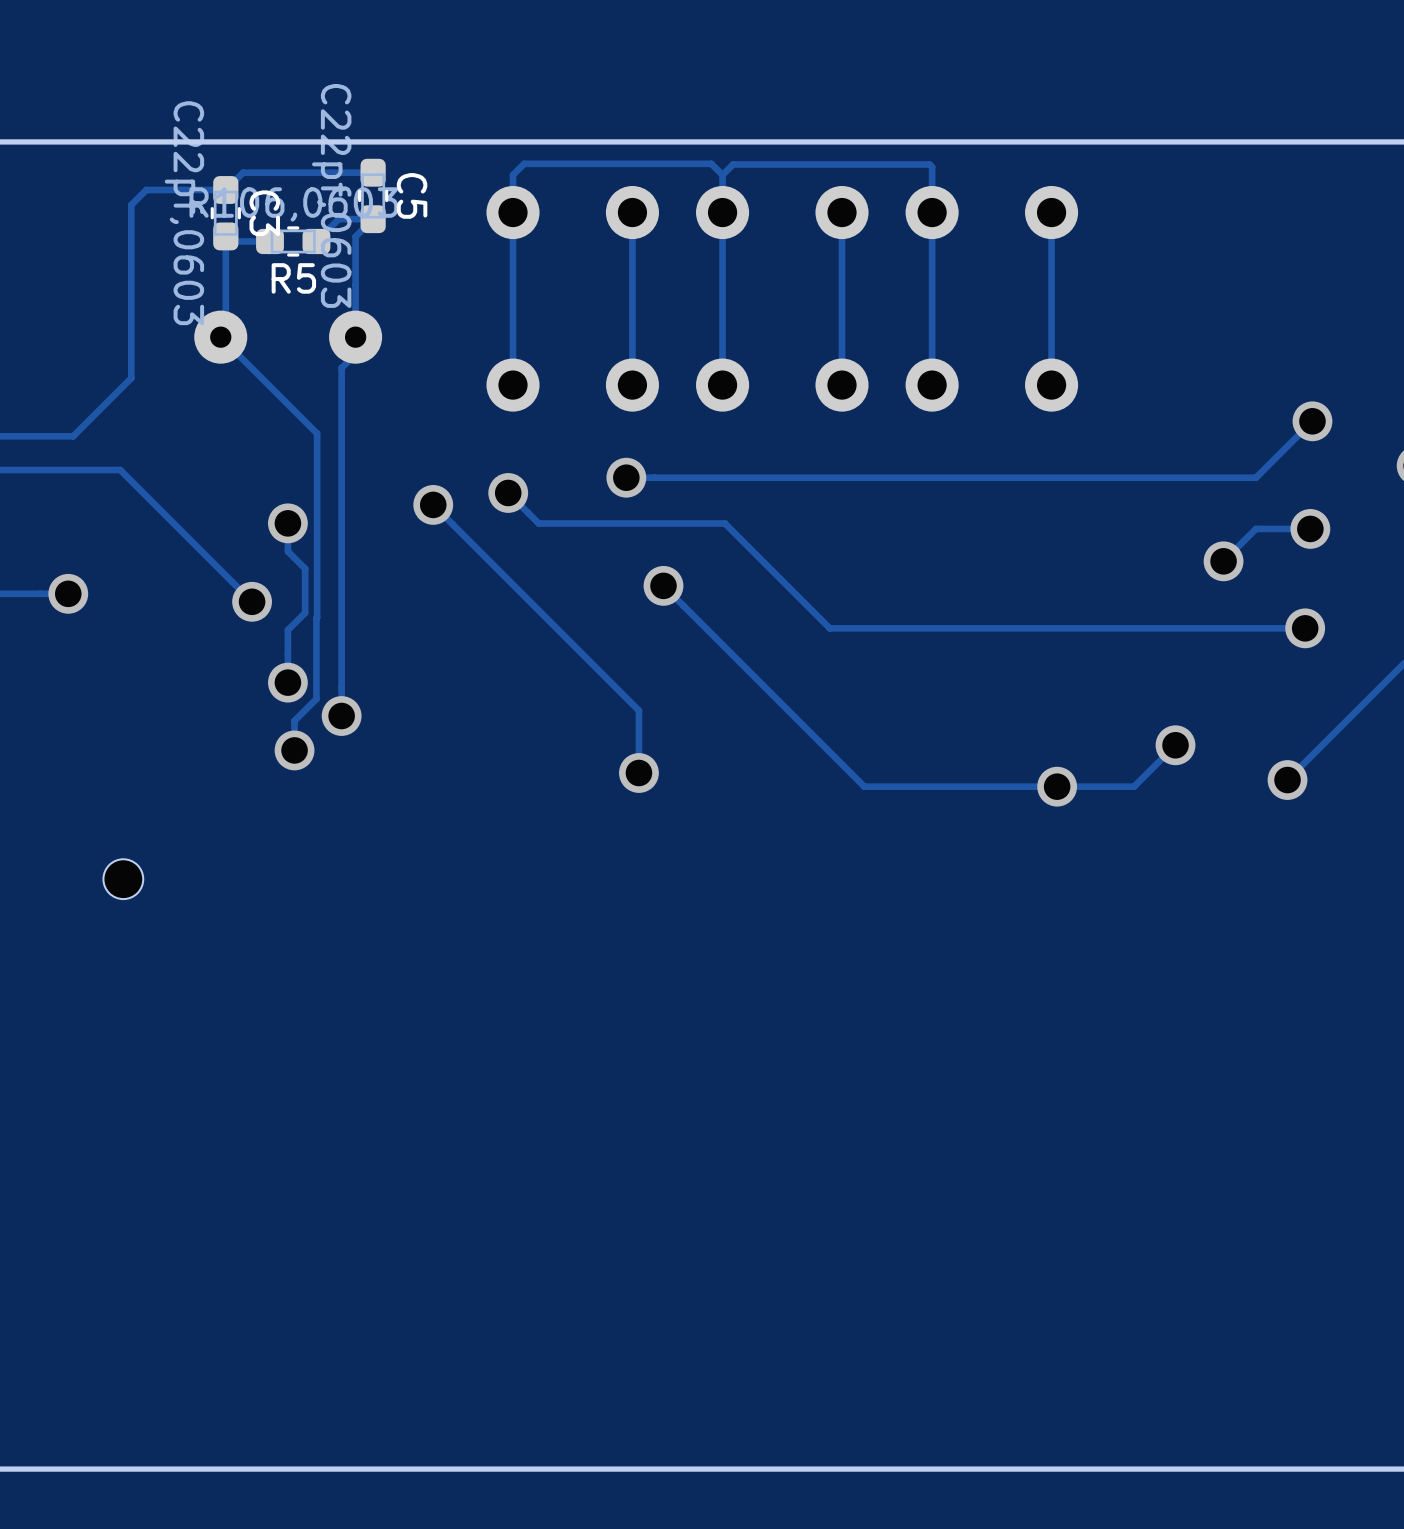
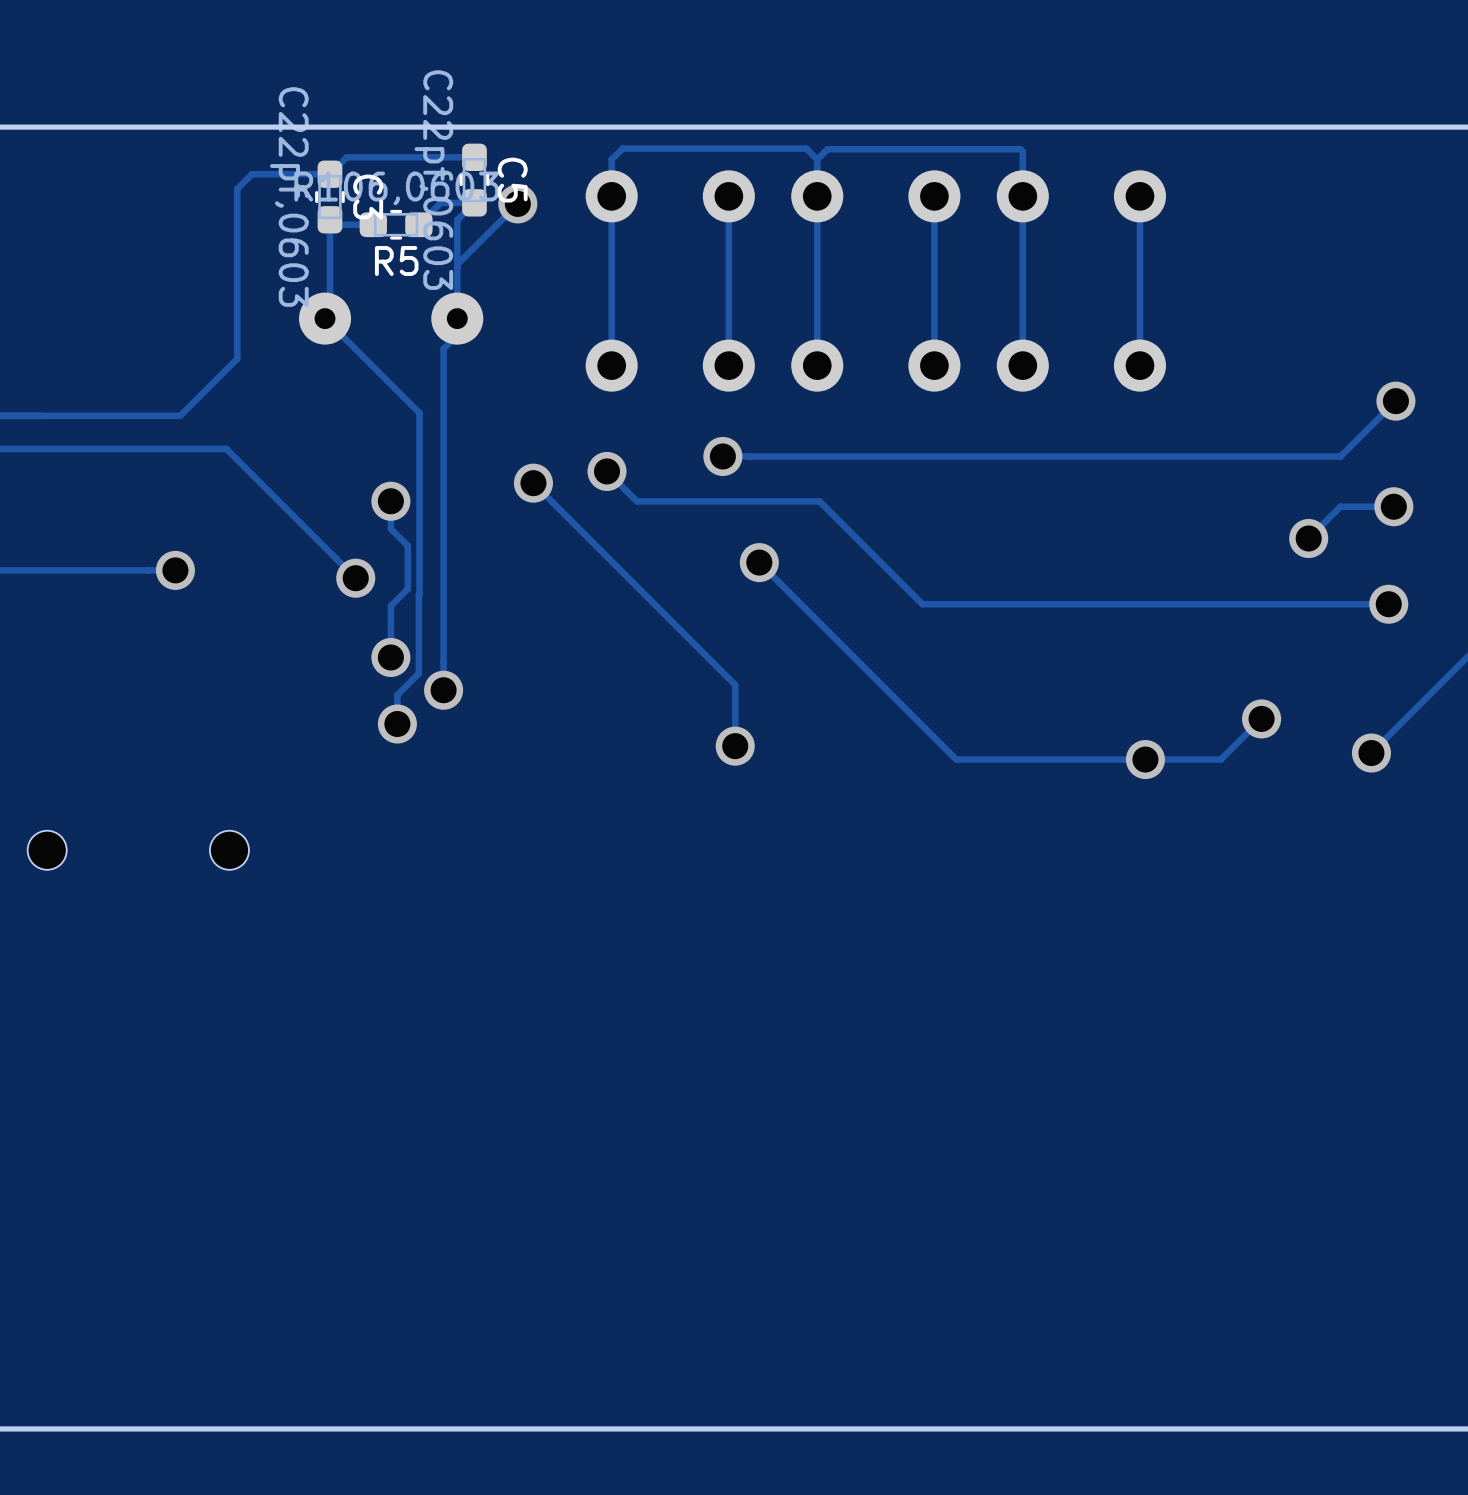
track: none -> (517, 203) (457, 264)
via: none -> (517, 203)

